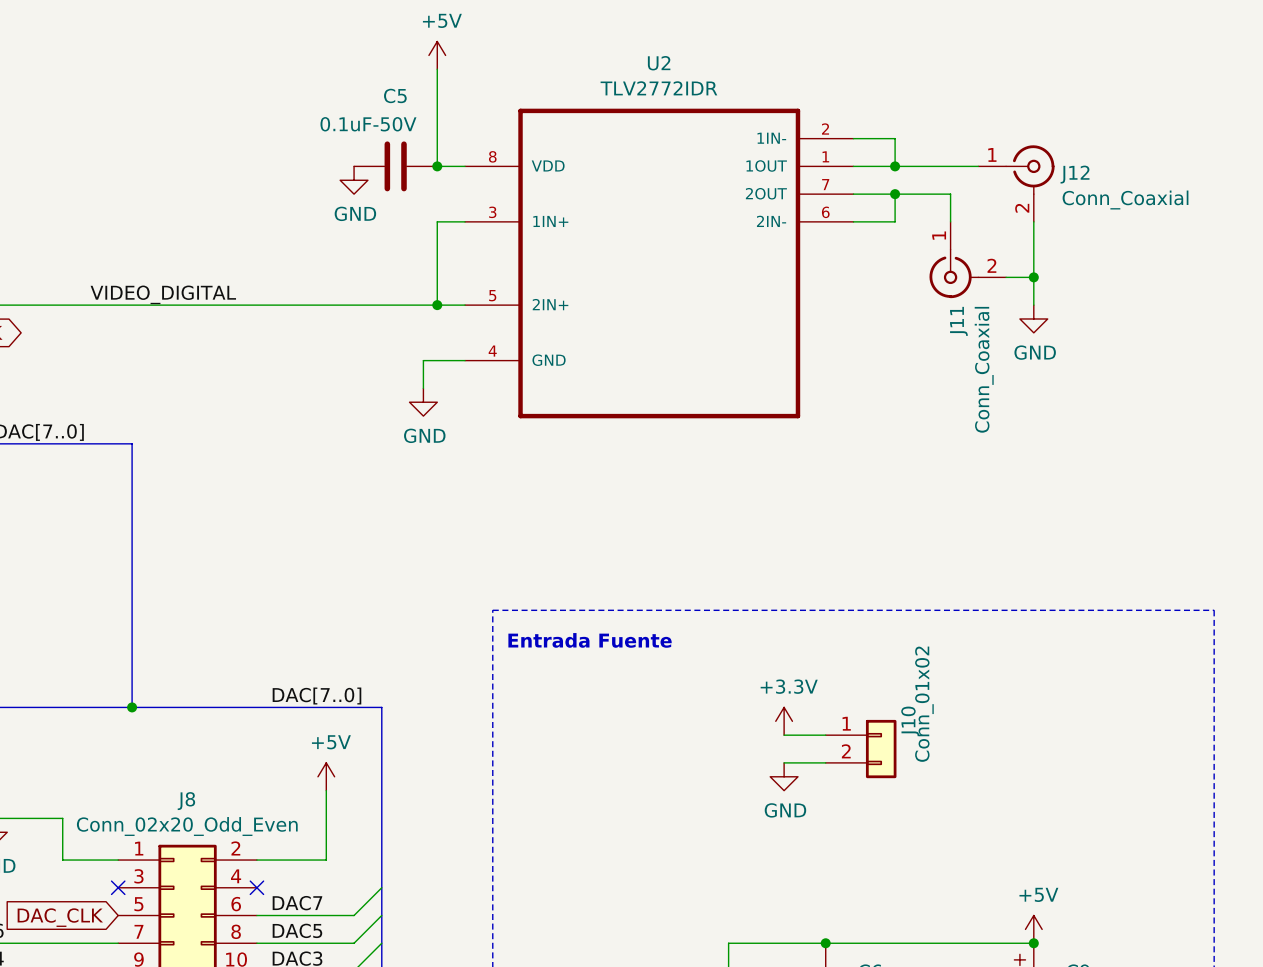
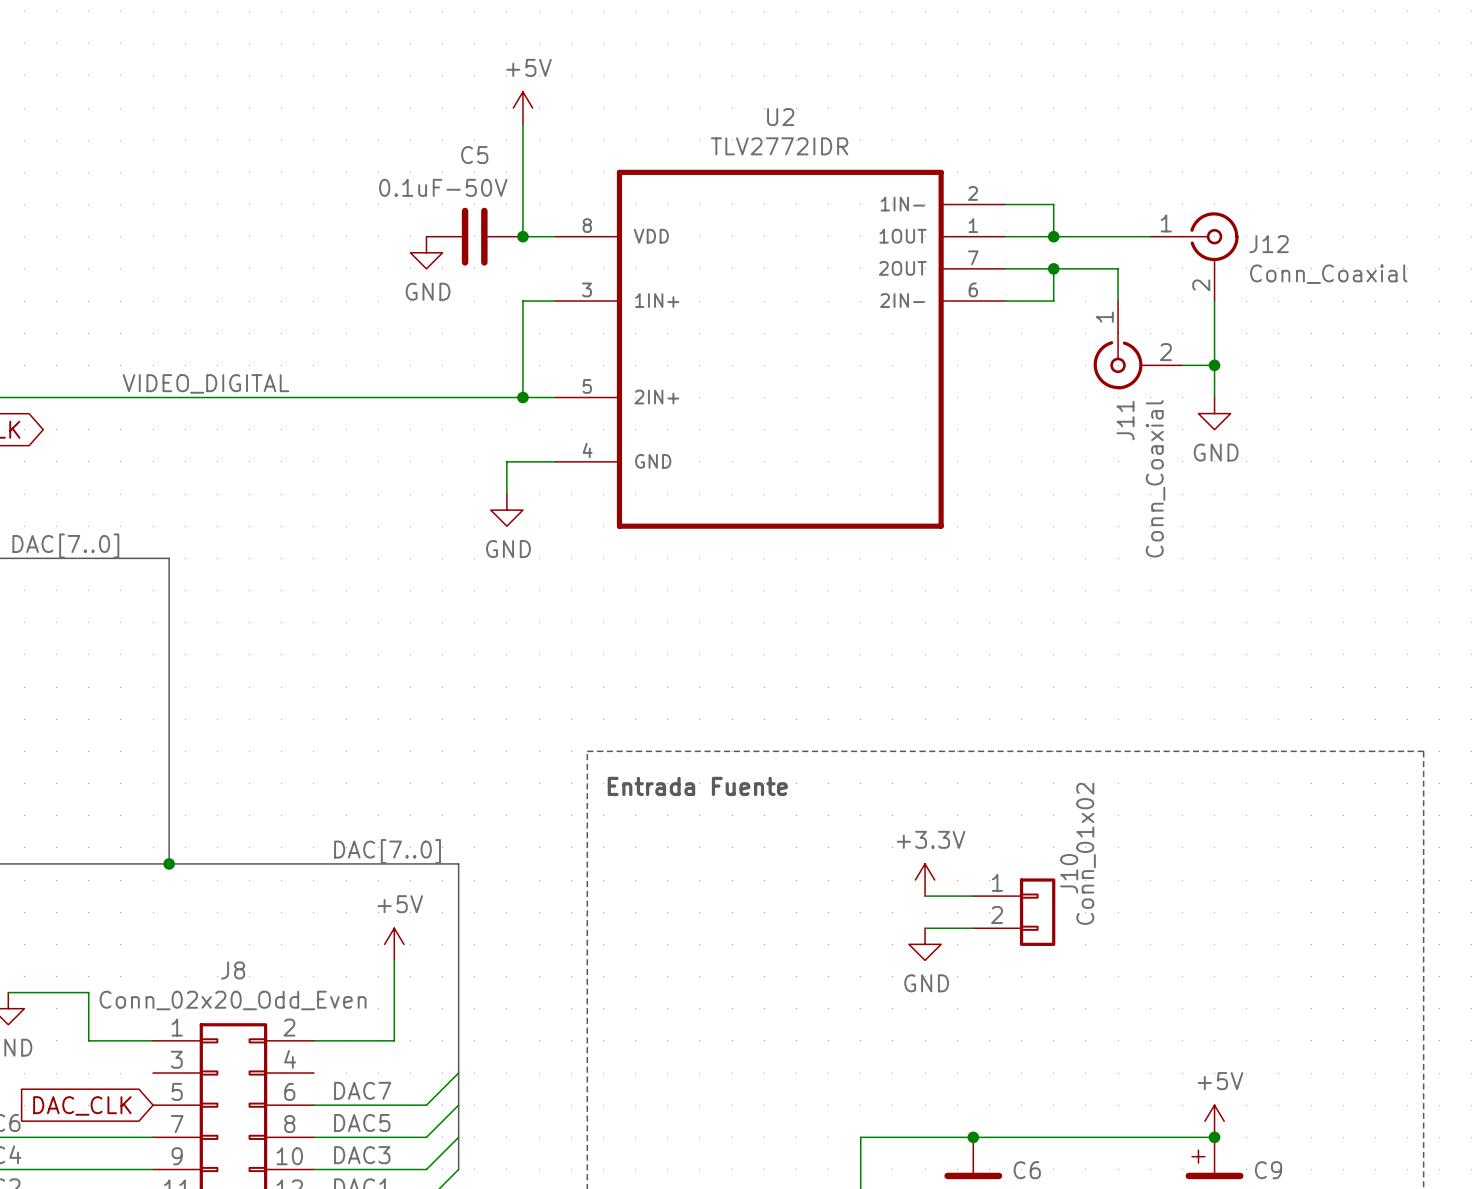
no-connect mark: (118, 887) -> none
no-connect mark: (256, 887) -> none

